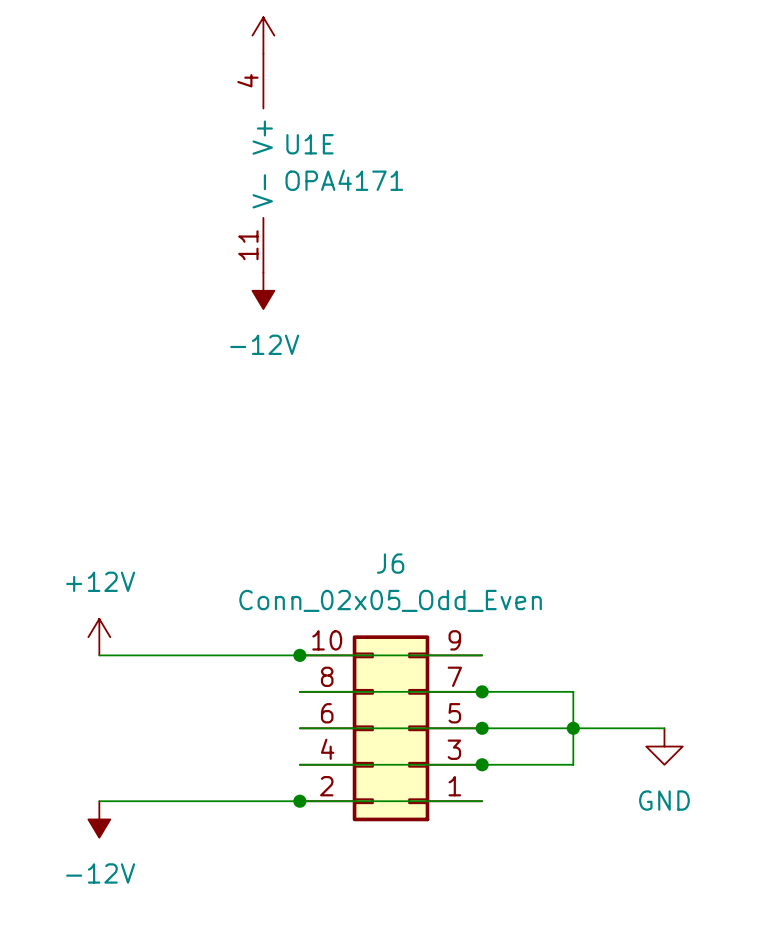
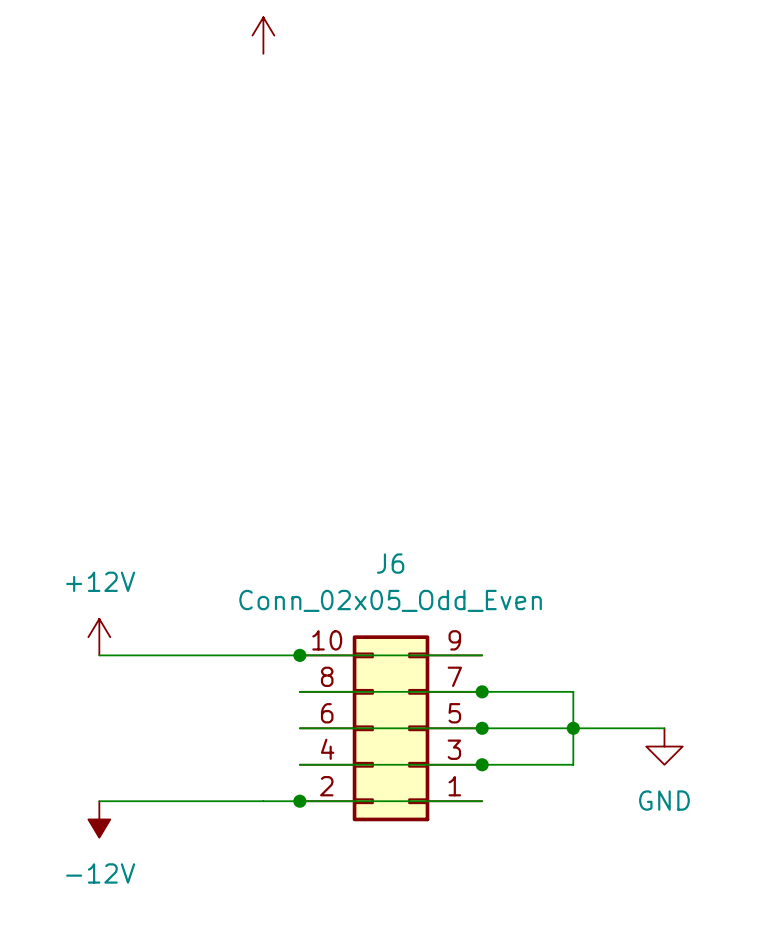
U1E: OPA4171 (263, 163) -> none
power symbol: -12V (263, 290) -> none

